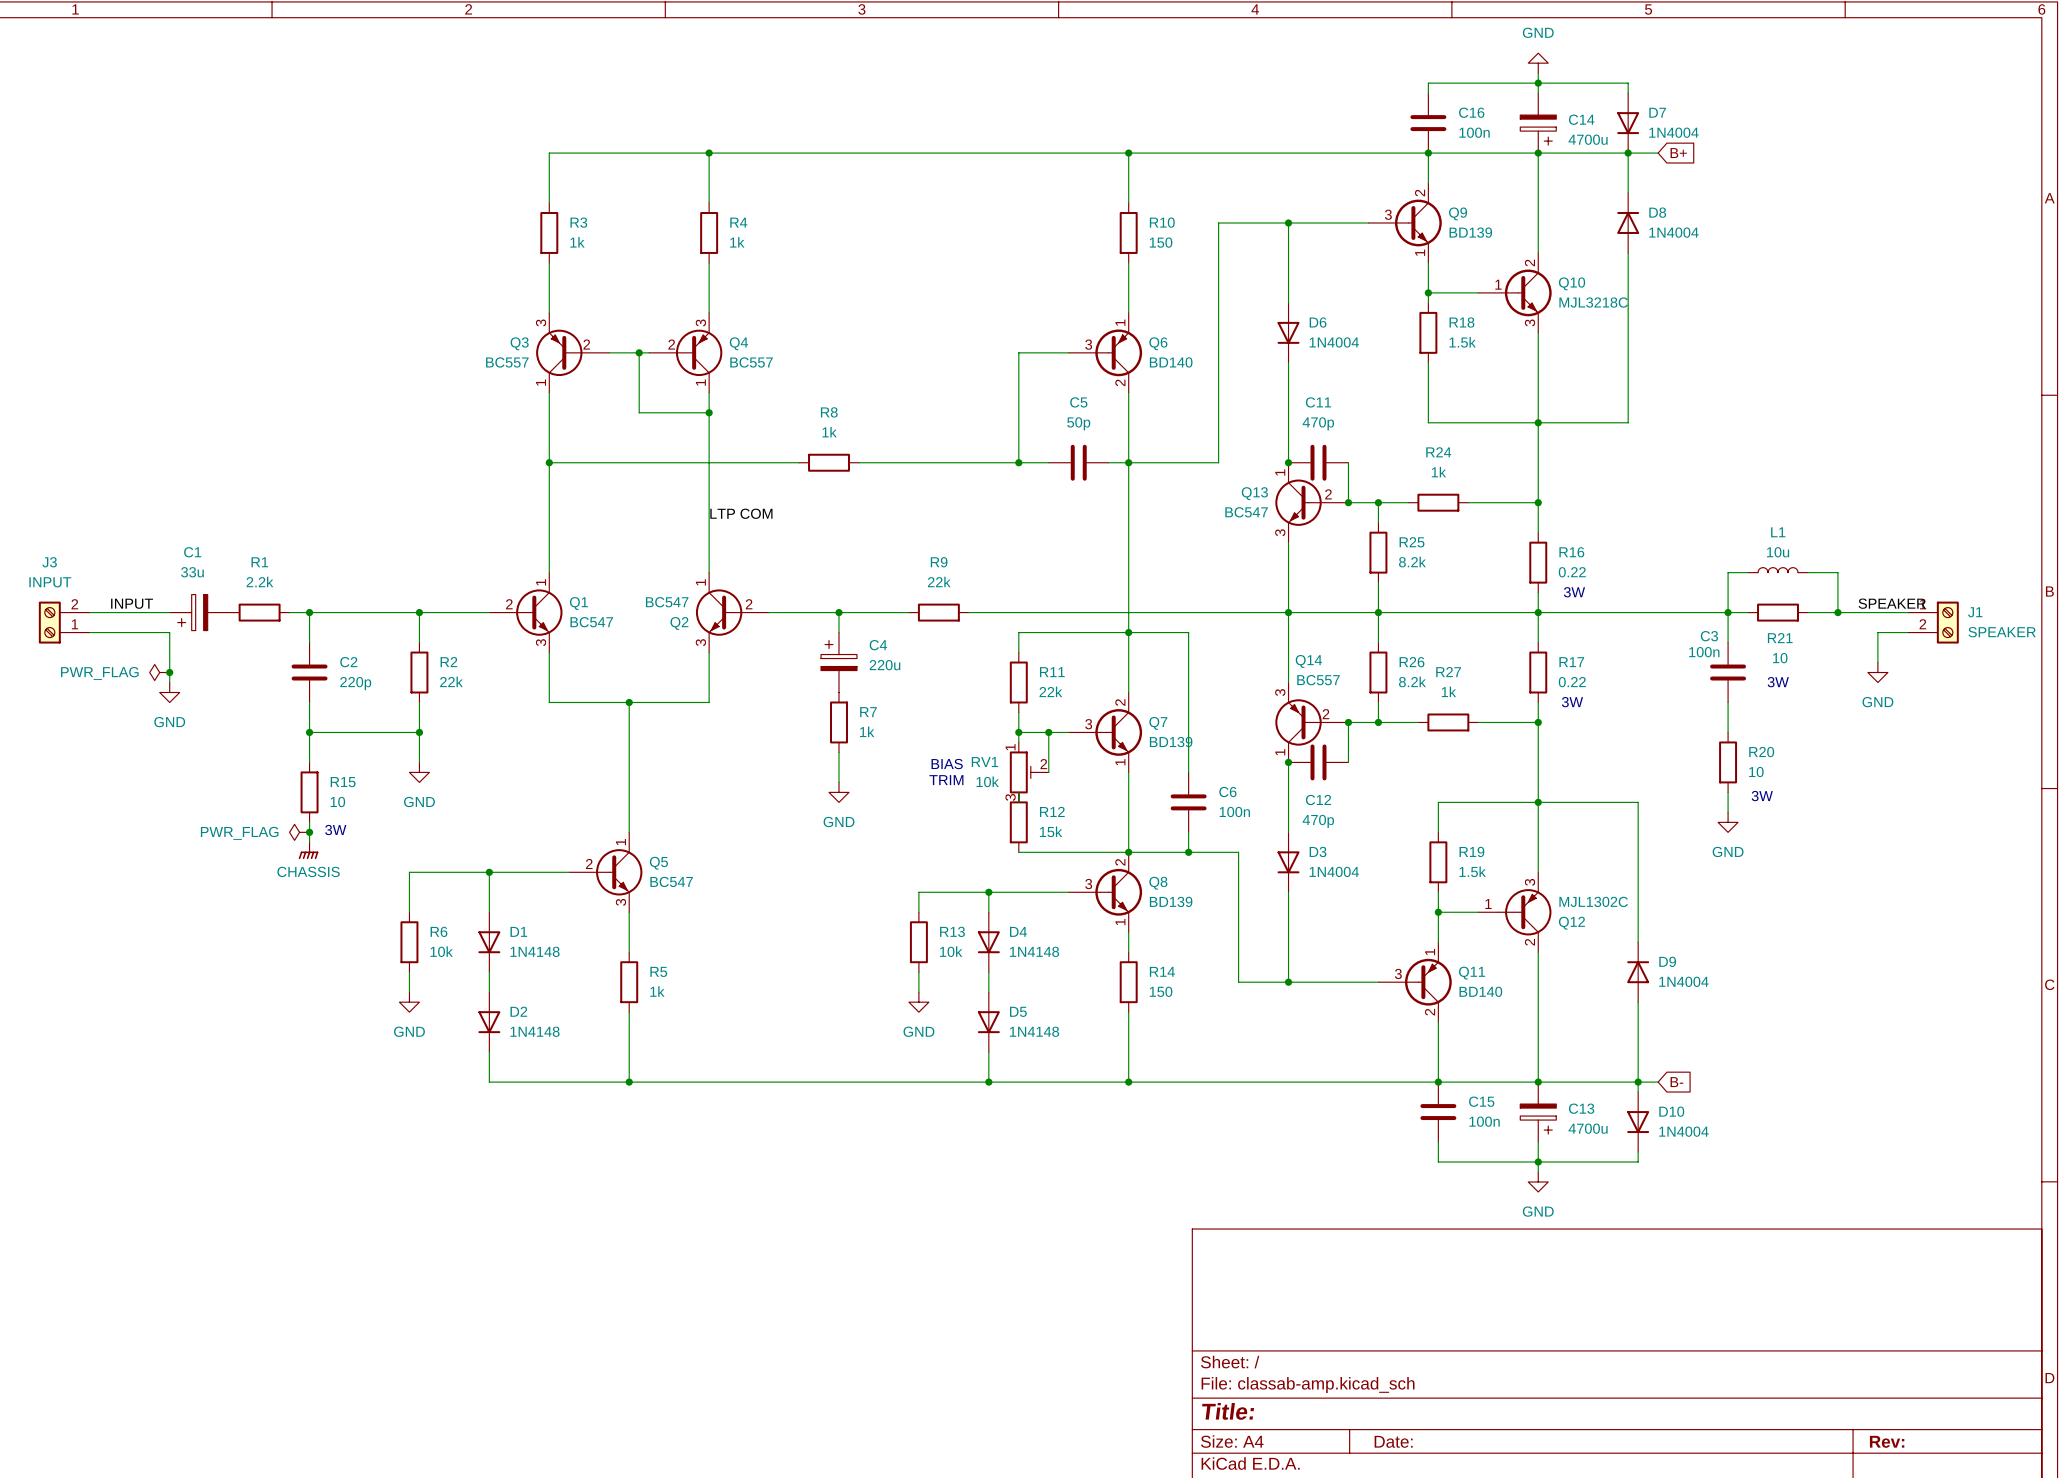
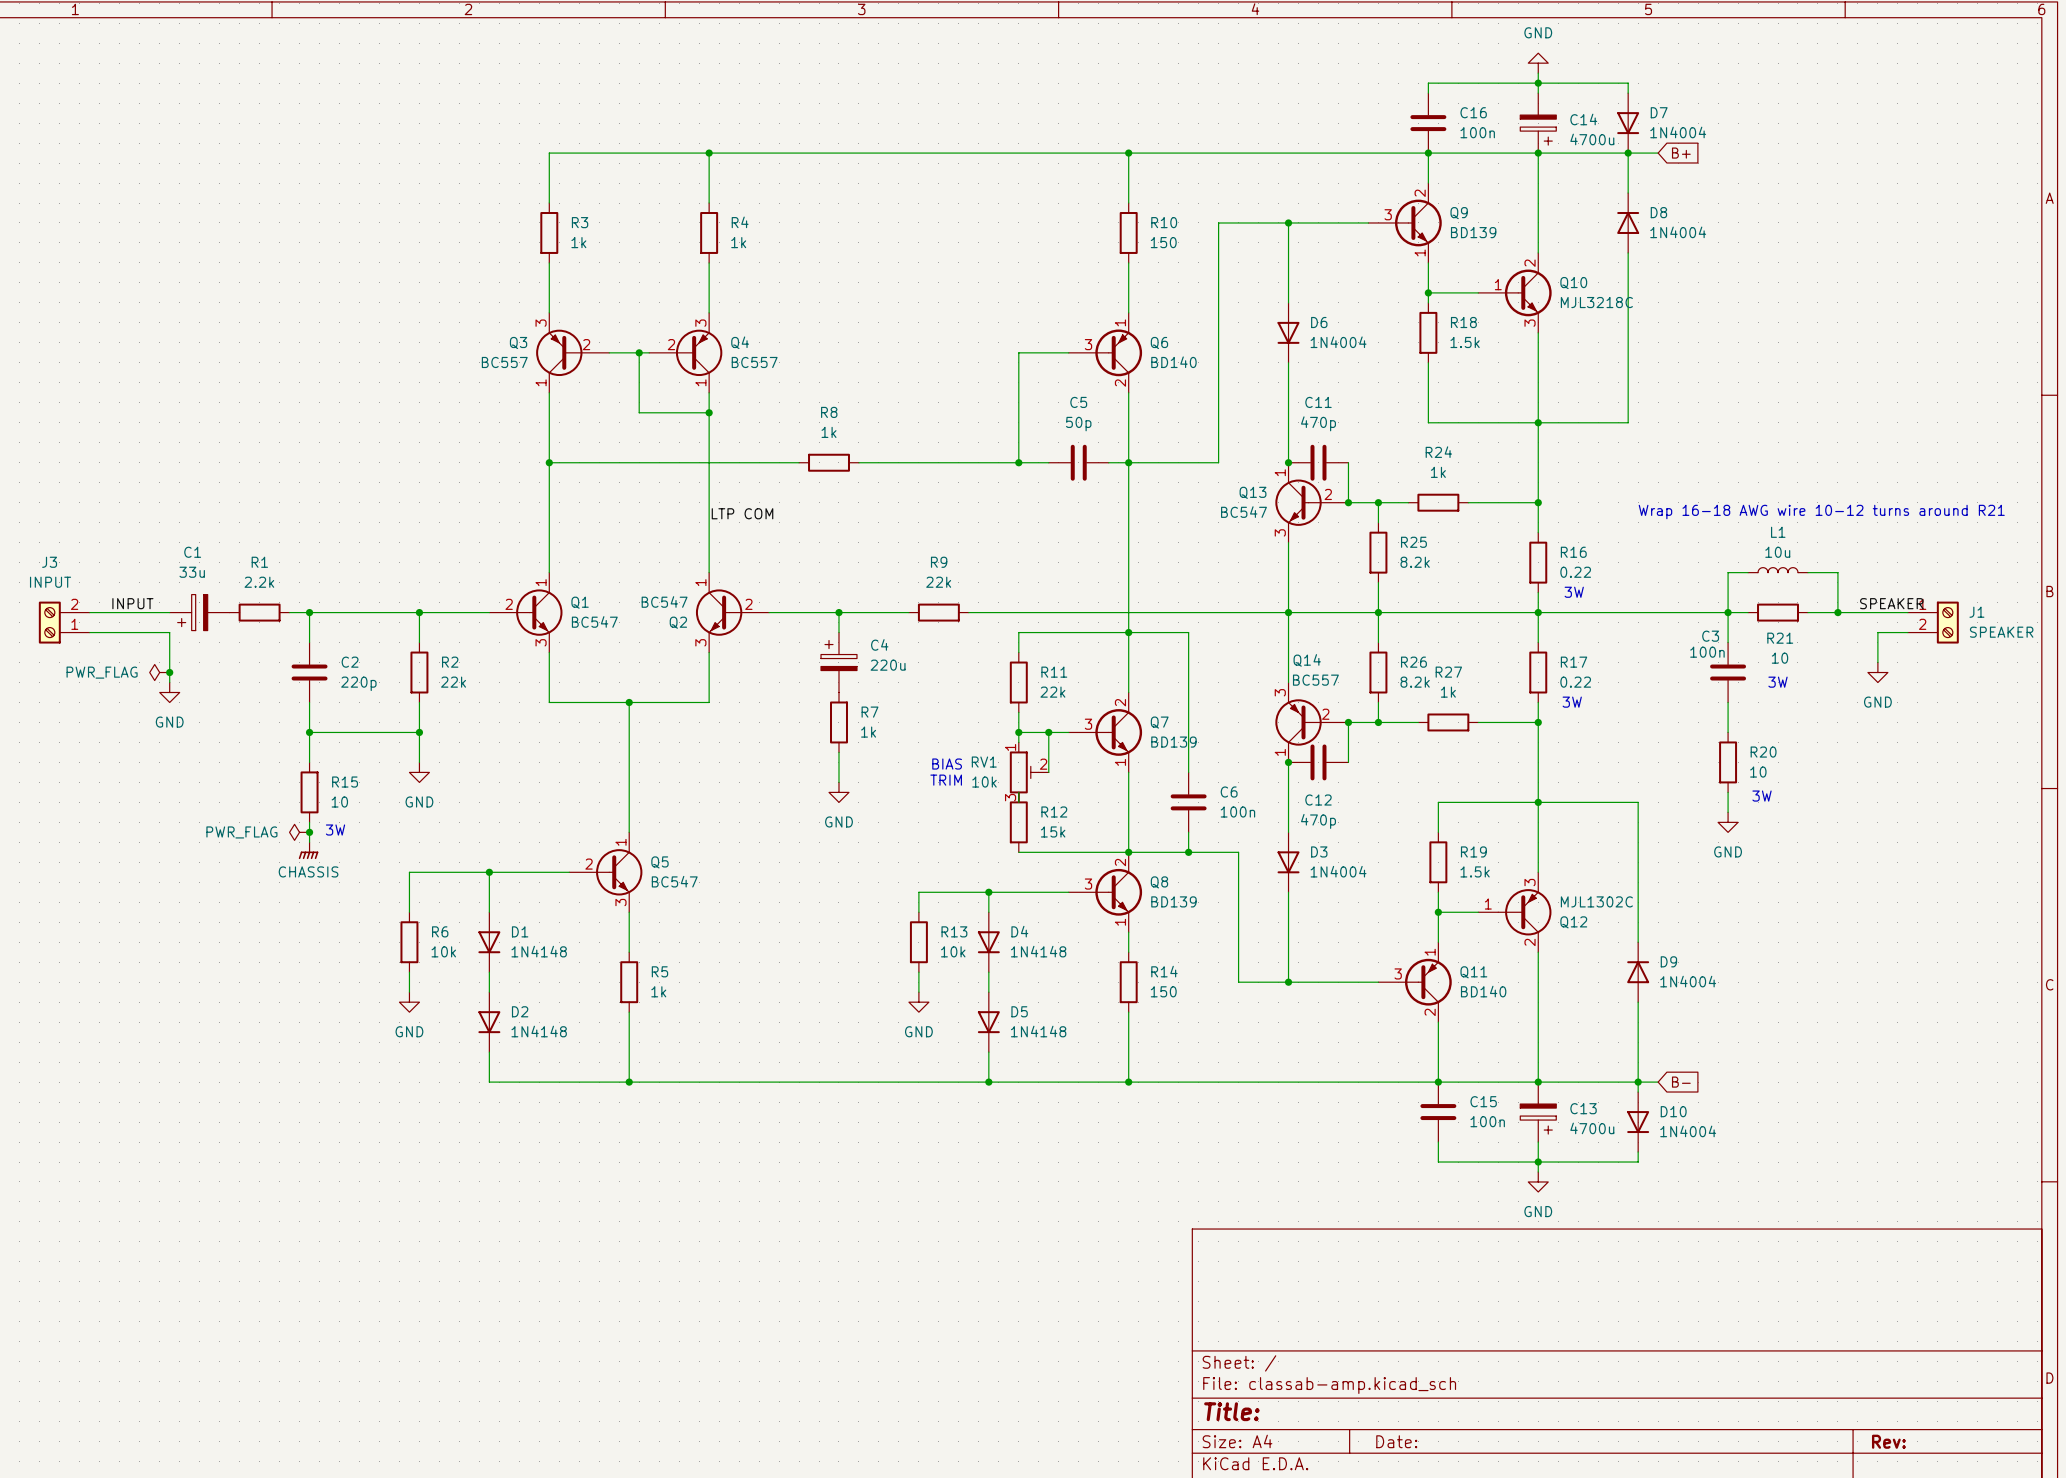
text: none -> Wrap 16-18 AWG wire 10-12 turns around R21 (1821, 512)

